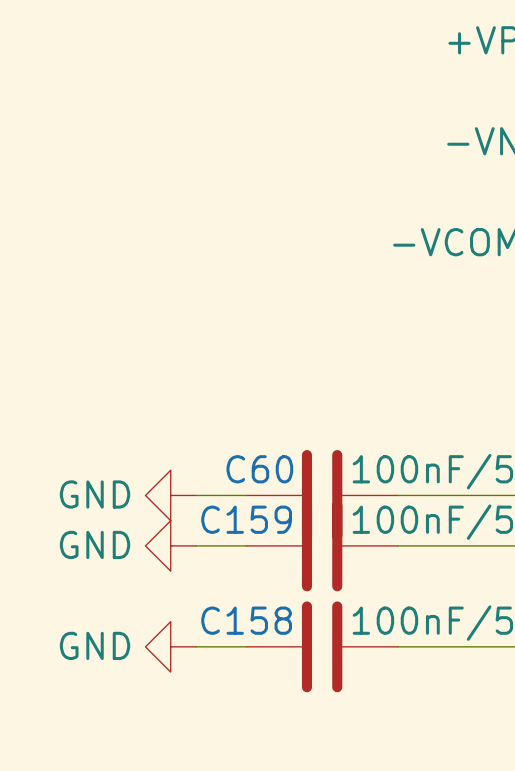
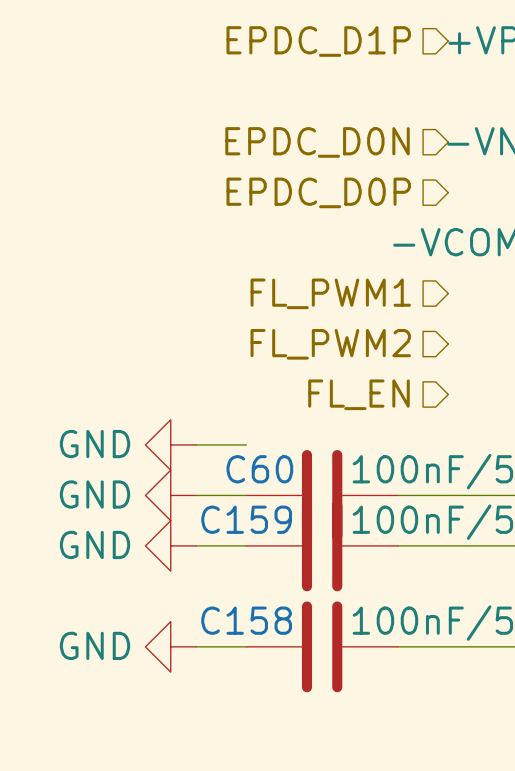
hierarchical label: none -> EPDC_D1P (318, 41)
hierarchical label: none -> EPDC_D0N (317, 142)
hierarchical label: none -> EPDC_D0P (318, 192)
hierarchical label: none -> FL_PWM1 (330, 293)
hierarchical label: none -> FL_PWM2 (330, 344)
hierarchical label: none -> FL_EN (358, 394)
power symbol: none -> GND (170, 444)
wire: none -> (195, 444) (246, 444)

